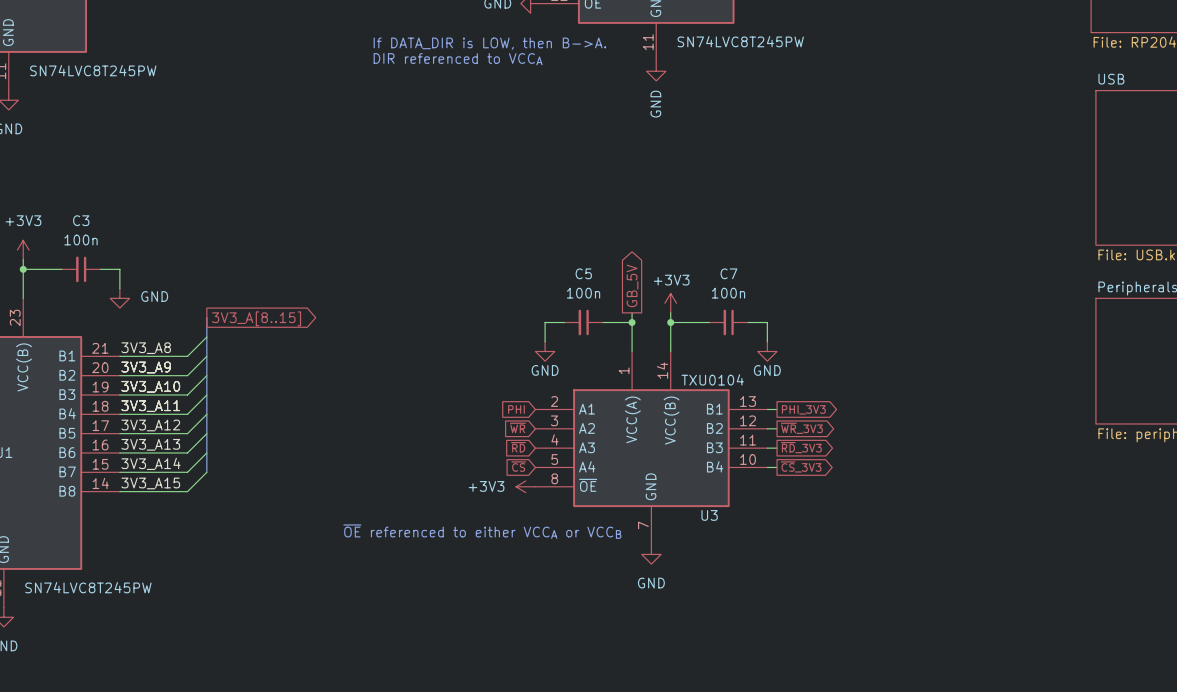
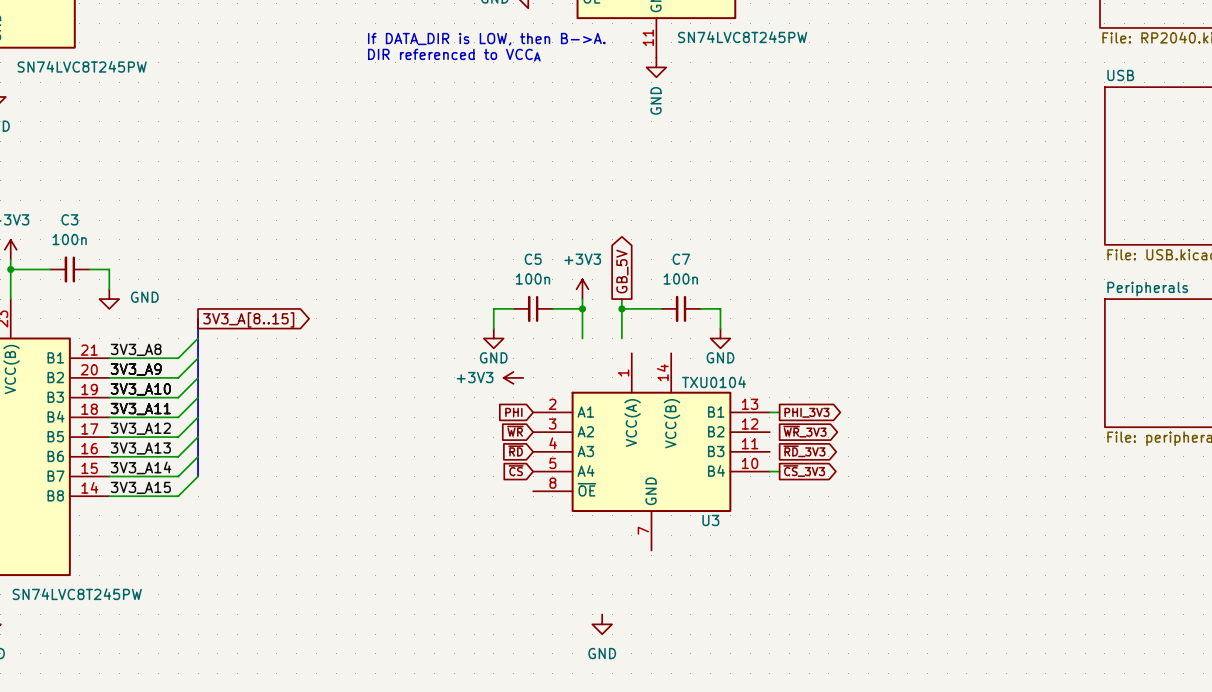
global label position: GB_5V (632, 285) -> GB_5V (622, 271)
power symbol: none -> +3V3 (582, 289)
power symbol: +3V3 (670, 303) -> none
junction: none -> (582, 308)
wire: (632, 312) (632, 351) -> (582, 299) (582, 338)
wire: (670, 312) (670, 351) -> (621, 299) (621, 338)
wire: (564, 322) (545, 322) (545, 341) -> (513, 308) (493, 308) (493, 328)
C5 position: (583, 322) -> (533, 308)
wire: (603, 322) (632, 322) -> (552, 308) (582, 308)
junction position: (632, 322) -> (621, 308)
wire: (670, 322) (709, 322) -> (621, 308) (661, 308)
junction: (670, 322) -> none
C7 position: (728, 322) -> (681, 308)
wire: (748, 322) (767, 322) (767, 341) -> (700, 308) (720, 308) (720, 328)
power symbol position: GND (545, 351) -> GND (493, 338)
power symbol position: GND (767, 351) -> GND (720, 338)
power symbol: none -> +3V3 (513, 377)
wire: (767, 428) (777, 428) -> none
wire: (767, 448) (777, 448) -> none
power symbol: +3V3 (525, 486) -> none
text: ~{OE} referenced to either VCCA or VCCB (482, 531) -> none
power symbol position: GND (651, 554) -> GND (602, 624)

